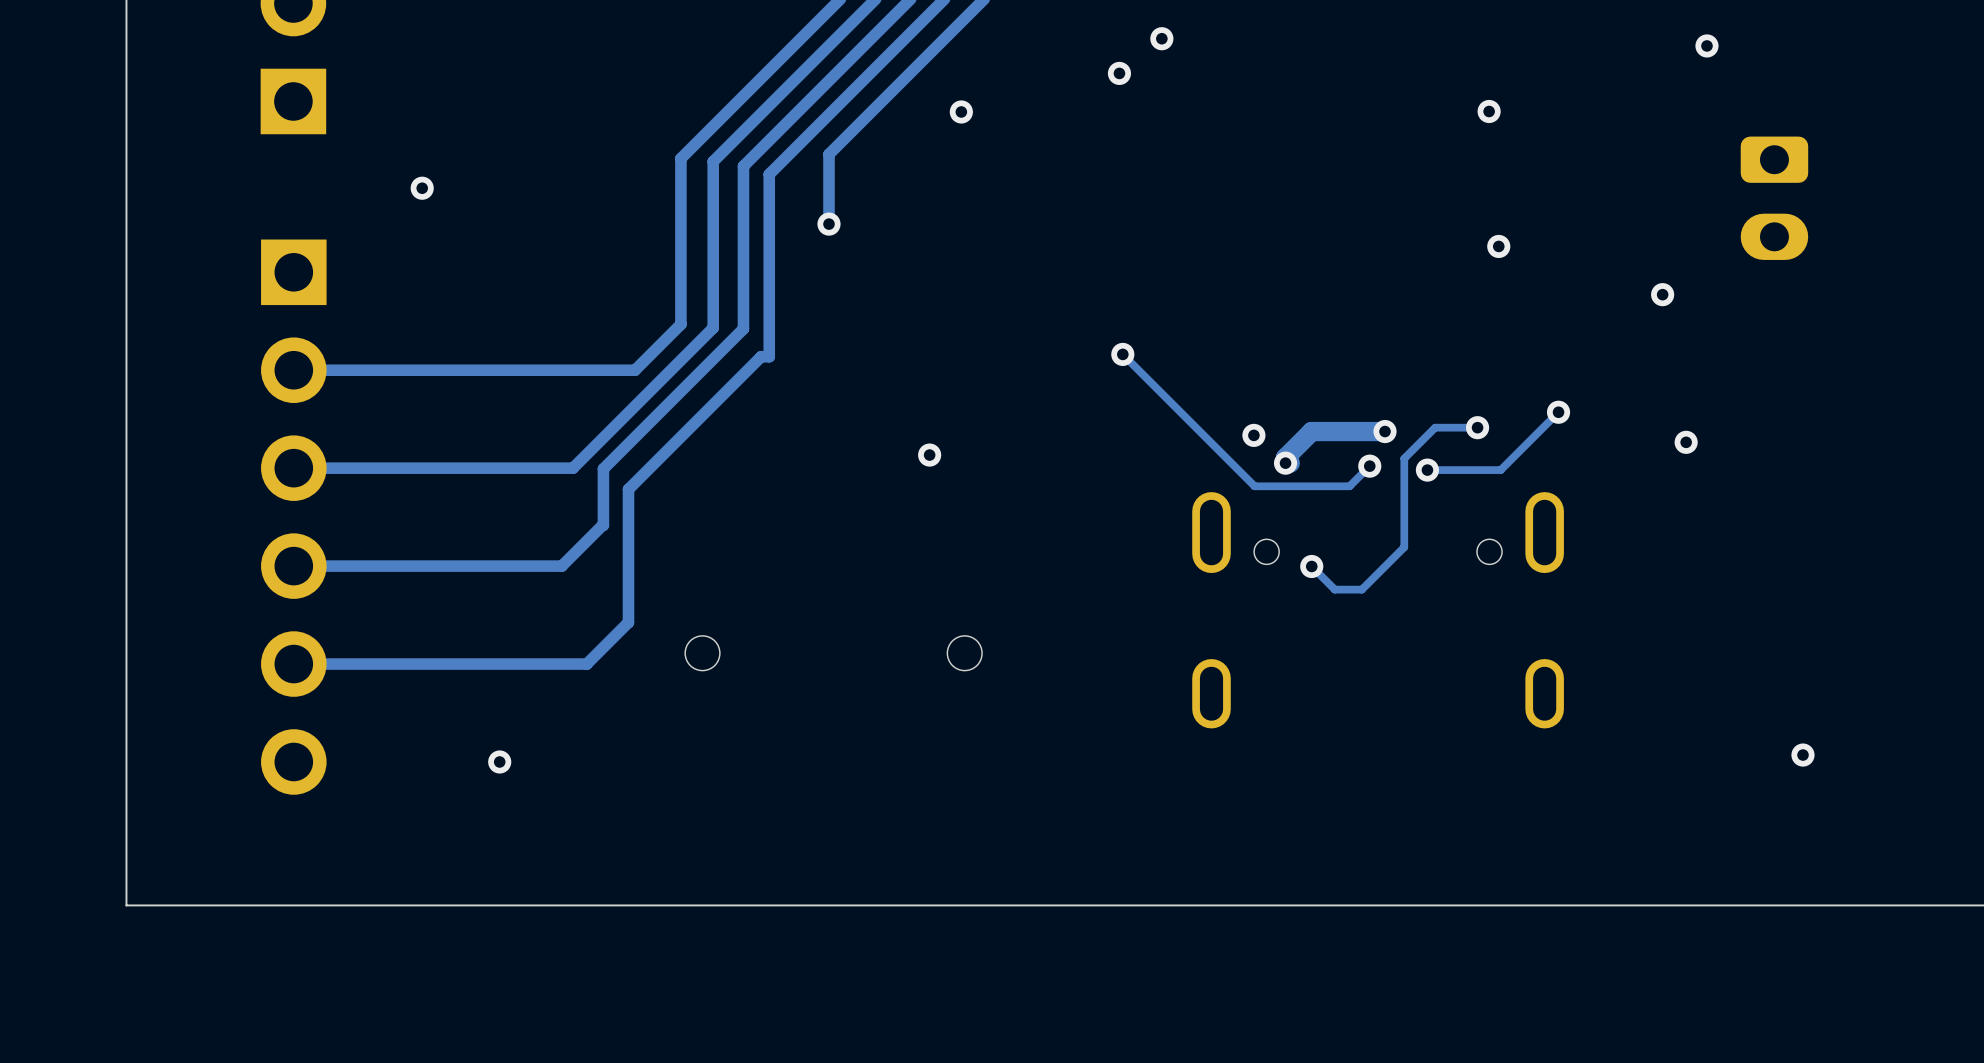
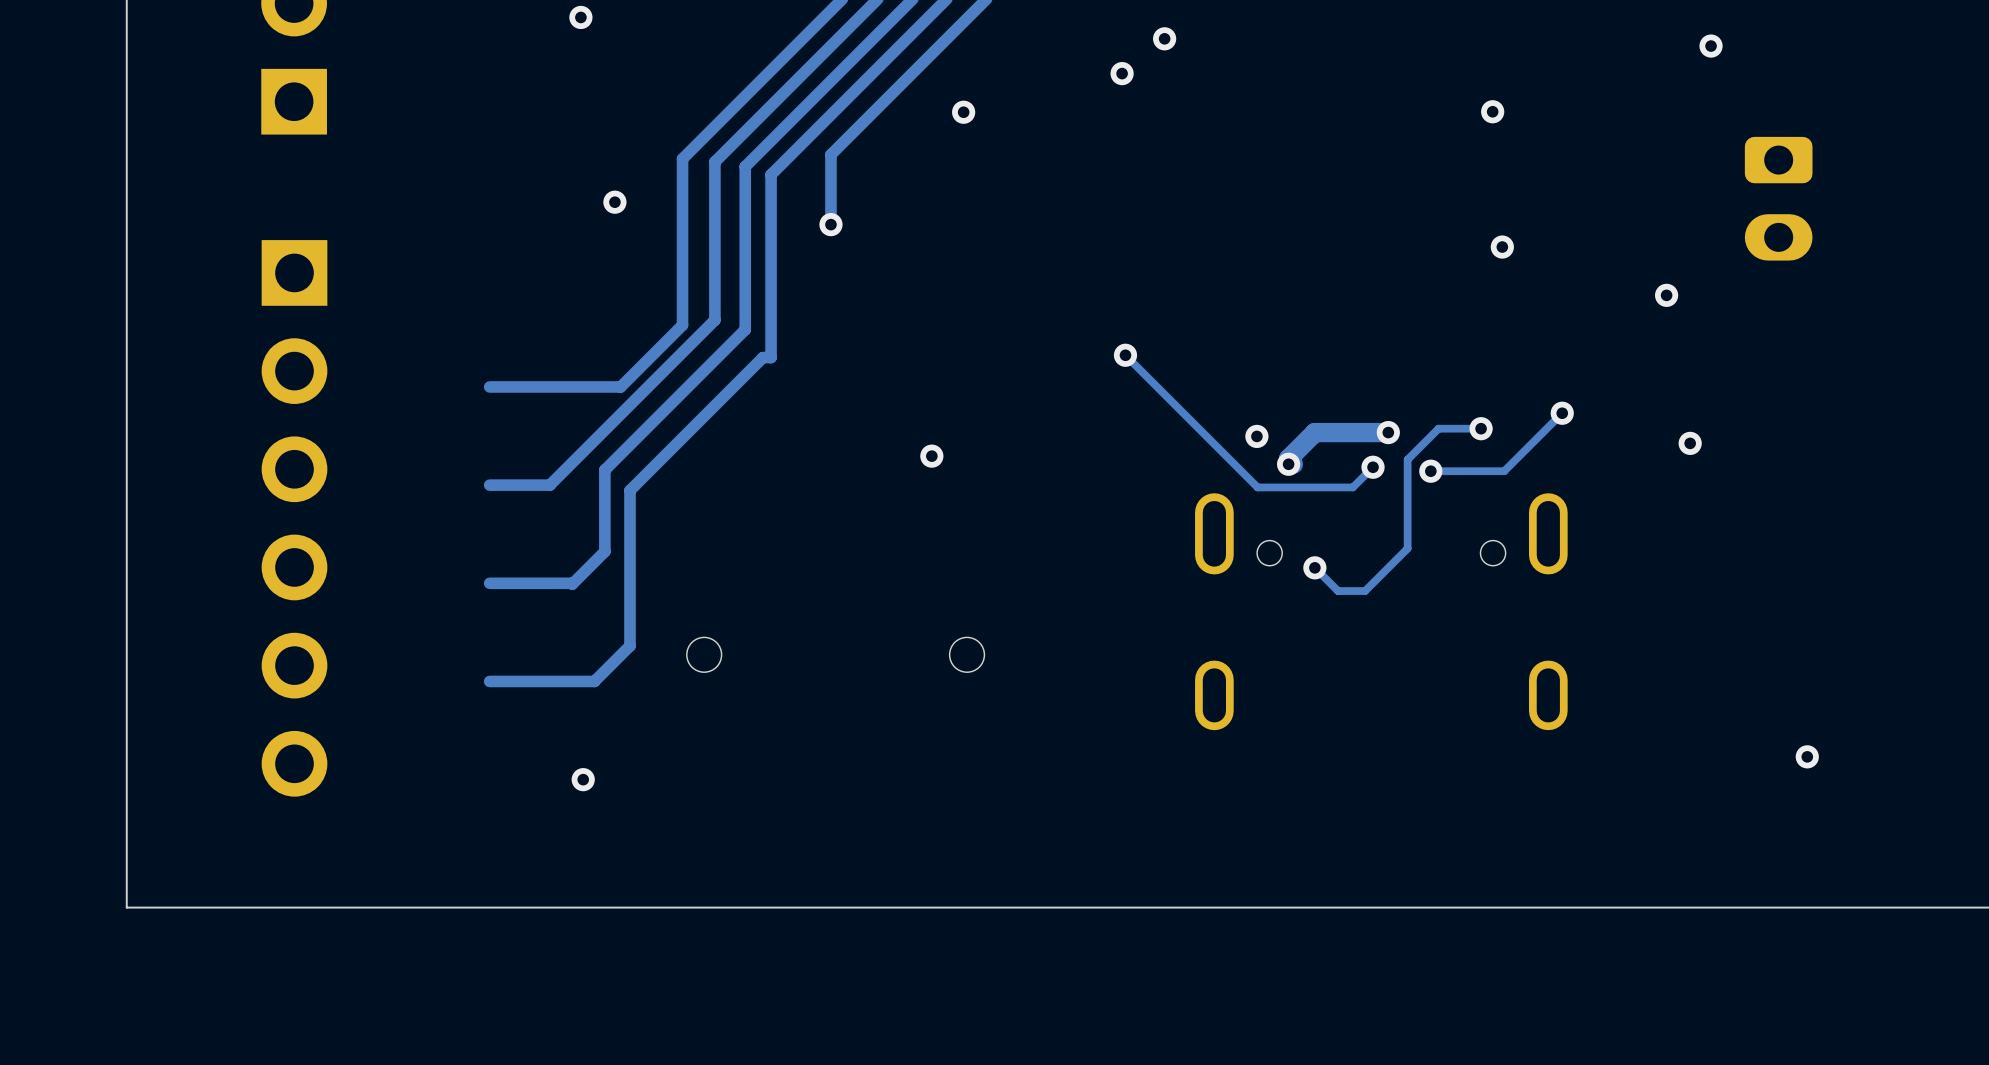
via: none -> (580, 17)
via: (422, 188) -> none
via: none -> (614, 202)
track: (713, 319) (713, 327) (572, 468) (293, 468) -> (714, 320) (549, 485) (489, 485)
track: (635, 370) (293, 370) -> (636, 371) (620, 386) (489, 386)
track: (602, 525) (561, 566) (293, 566) -> (604, 526) (604, 551) (572, 584) (489, 583)
track: (628, 622) (586, 664) (293, 664) -> (629, 623) (629, 645) (594, 681) (489, 681)
via position: (499, 761) -> (583, 779)

